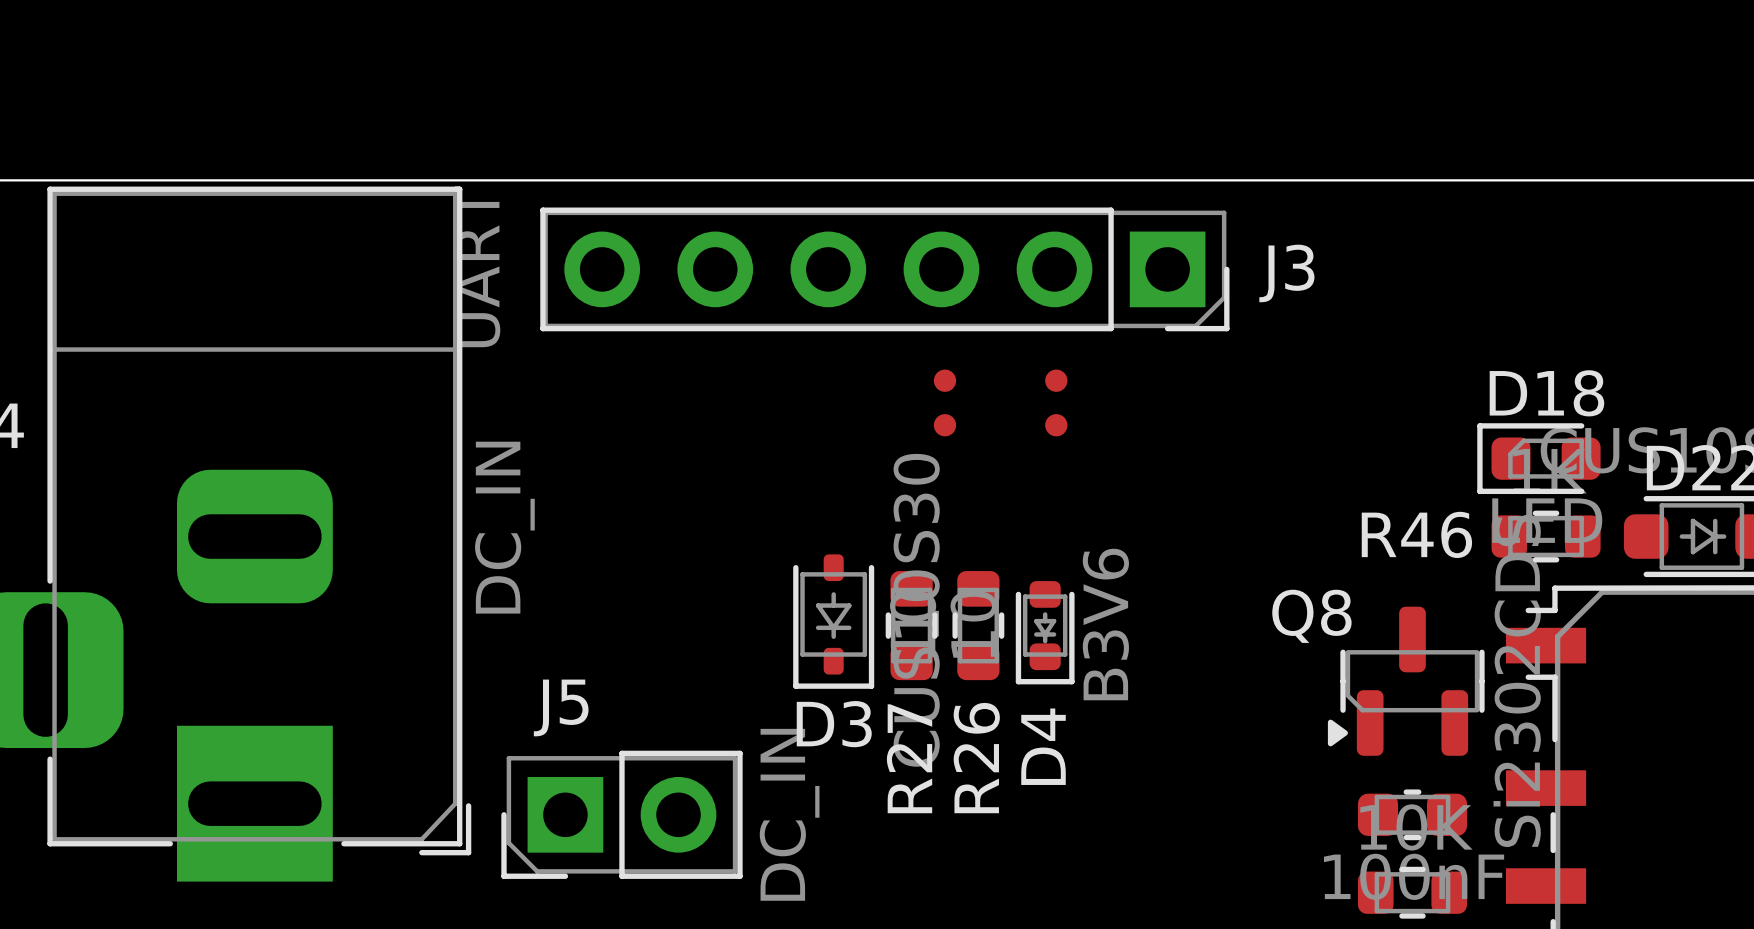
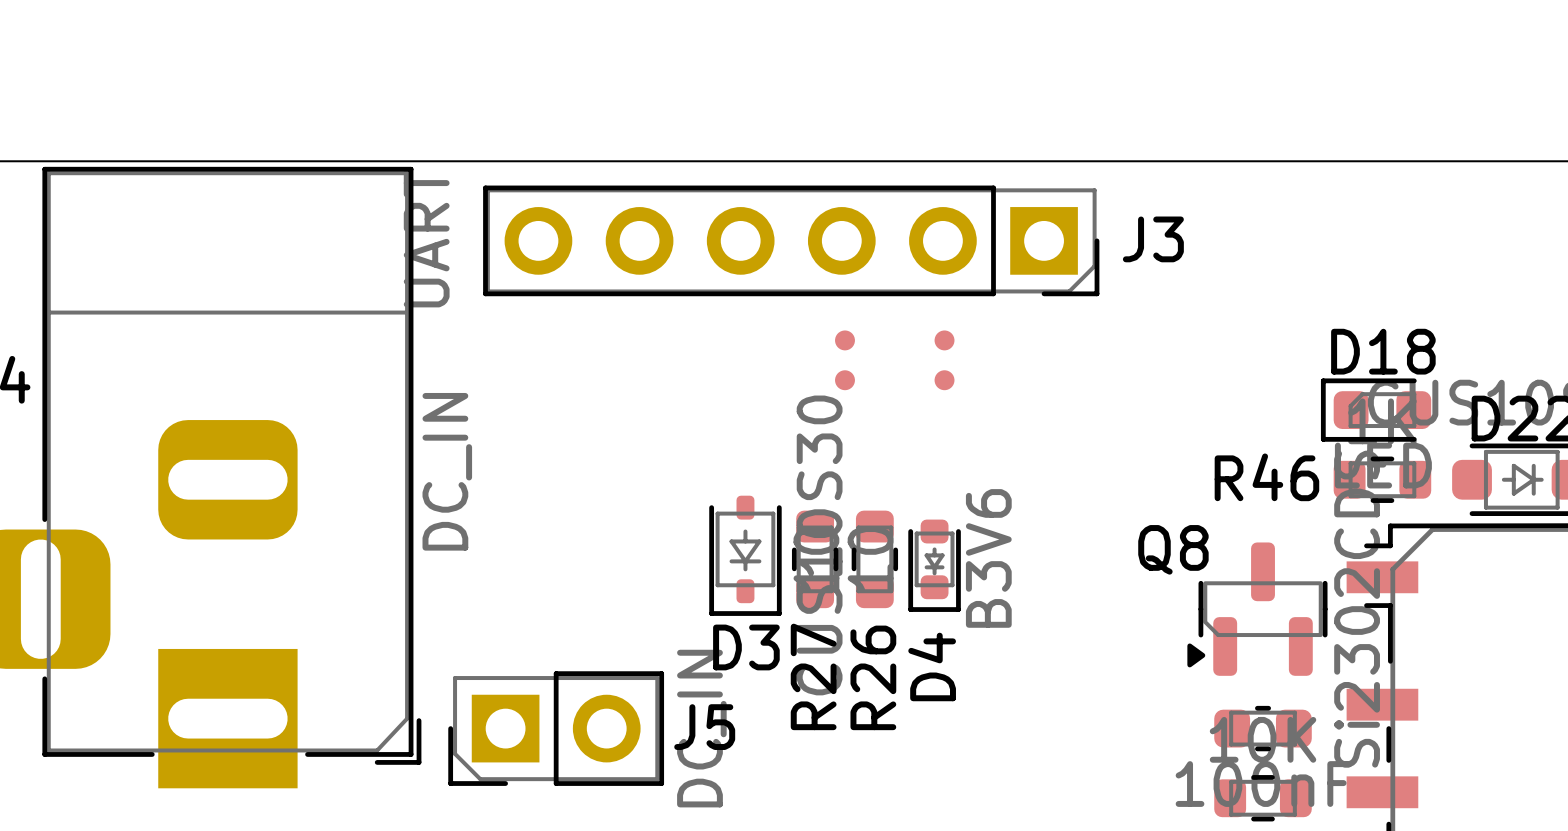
J5 name position: J5 (561, 707) -> J5 (704, 727)

